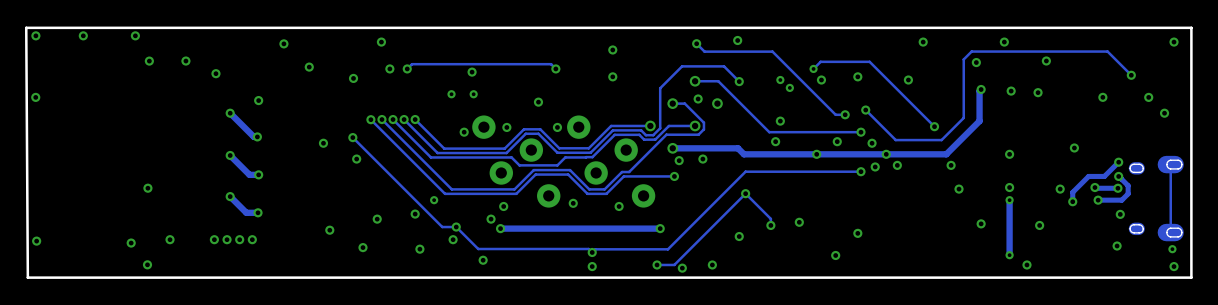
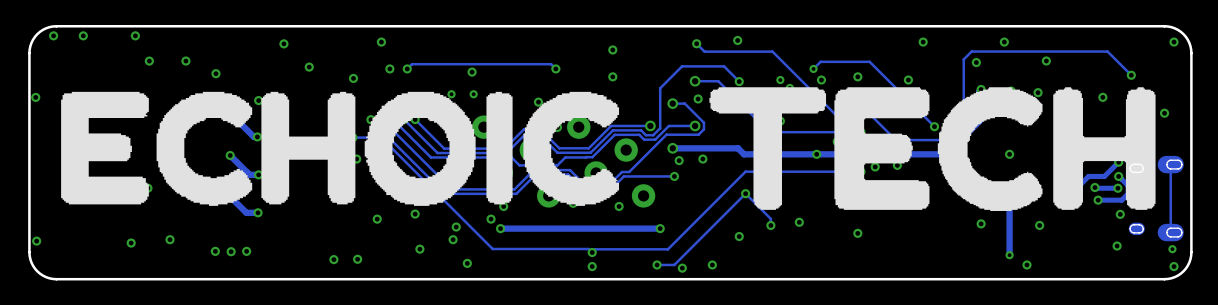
via position: (35, 35) -> (53, 35)
board edge: (1191, 53) (1191, 27) (26, 27) (27, 277) (1191, 277) (1191, 252) -> (1191, 53) (1189, 42) (1183, 34) (1174, 28) (1164, 26) (56, 26) (46, 28) (37, 34) (31, 42) (29, 53) (29, 255) (37, 271) (52, 278) (1164, 279) (1174, 277) (1183, 271) (1189, 262) (1191, 252)
drawing: none -> [709, 87, 1156, 211]
drawing: none -> [61, 91, 620, 206]
track: (352, 137) (442, 227) (456, 227) (478, 249) (492, 249) -> (352, 137) (381, 137) (492, 249)
via: (329, 230) -> none
via: (214, 239) -> none
via: (227, 239) -> none
via: (239, 239) -> none
via: (252, 239) -> none
via position: (362, 247) -> (357, 259)
via: none -> (215, 251)
via: none -> (231, 251)
via: none -> (246, 251)
via: (835, 255) -> none
via: none -> (333, 259)
via position: (483, 260) -> (467, 263)
via: (147, 264) -> none

